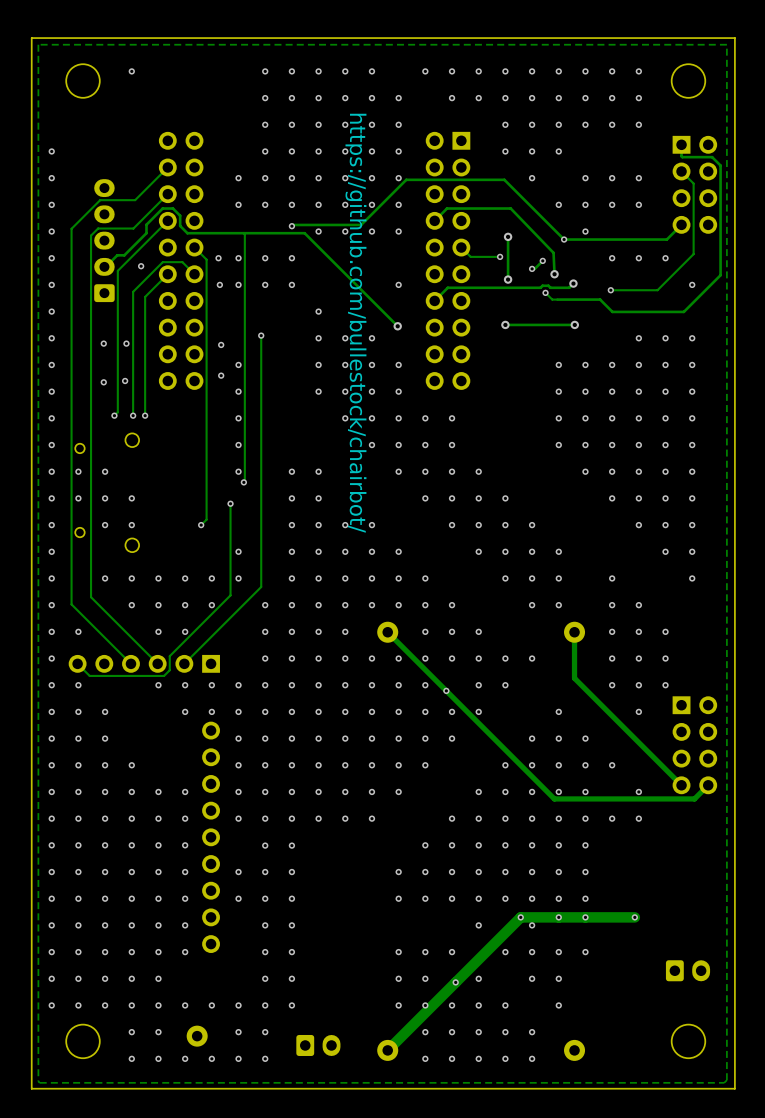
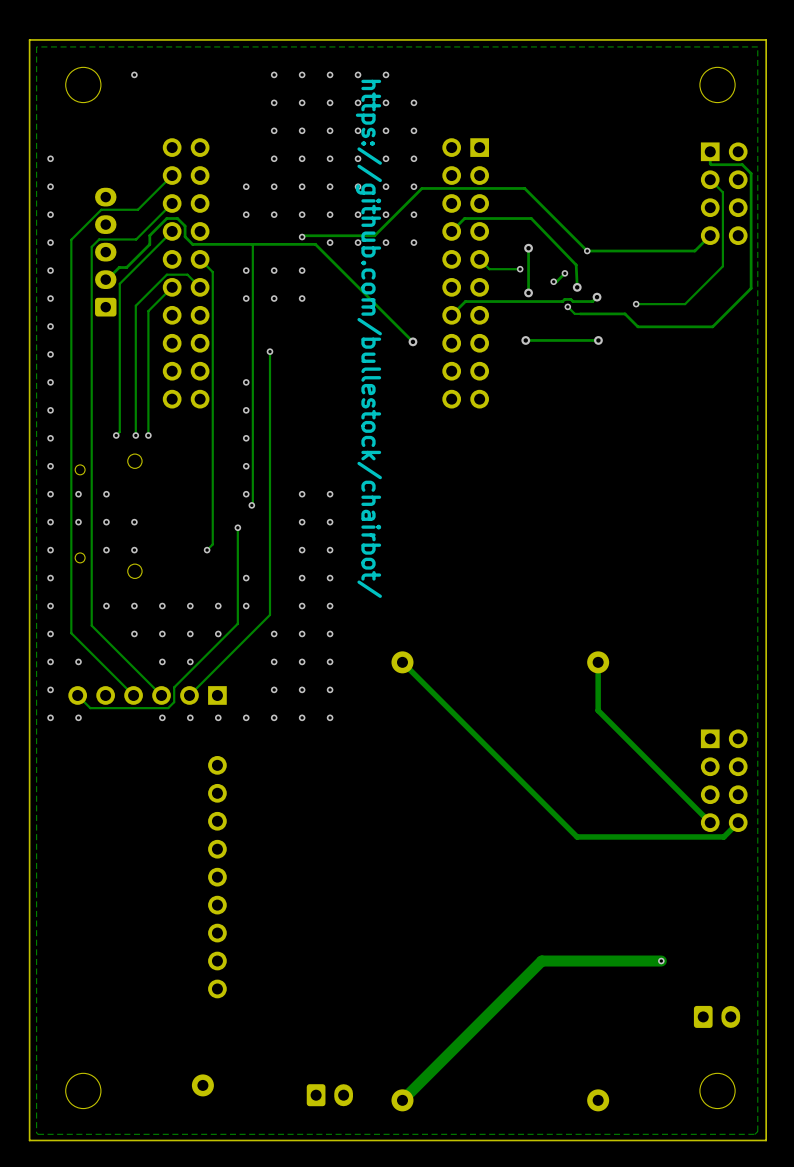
via: (425, 71) -> none
via: (452, 71) -> none
via: (478, 71) -> none
via: (505, 71) -> none
via: (532, 71) -> none
via: (558, 71) -> none
via: (585, 71) -> none
via: (612, 71) -> none
via: (638, 71) -> none
via: (452, 98) -> none
via: (478, 98) -> none
via: (505, 98) -> none
via: (532, 98) -> none
via: (558, 98) -> none
via: (585, 98) -> none
via: (612, 98) -> none
via: (638, 98) -> none
via: (505, 124) -> none
via: (532, 124) -> none
via: (558, 124) -> none
via: (585, 124) -> none
via: (612, 124) -> none
via: (638, 124) -> none
via: (505, 151) -> none
via: (532, 151) -> none
via: (558, 151) -> none
via: (532, 178) -> none
via: (585, 178) -> none
via: (612, 178) -> none
via: (638, 178) -> none
via: (558, 204) -> none
via: (585, 204) -> none
via: (612, 204) -> none
via: (638, 204) -> none
via: (585, 231) -> none
via: (218, 258) -> none
via: (612, 258) -> none
via: (638, 258) -> none
via: (665, 258) -> none
via: (141, 266) -> none
via: (219, 284) -> none
via: (398, 284) -> none
via: (692, 284) -> none
via: (318, 311) -> none
via: (318, 338) -> none
via: (345, 338) -> none
via: (371, 338) -> none
via: (638, 338) -> none
via: (665, 338) -> none
via: (692, 338) -> none
via: (103, 343) -> none
via: (126, 343) -> none
via: (221, 344) -> none
via: (318, 364) -> none
via: (345, 364) -> none
via: (371, 364) -> none
via: (398, 364) -> none
via: (558, 364) -> none
via: (585, 364) -> none
via: (612, 364) -> none
via: (638, 364) -> none
via: (665, 364) -> none
via: (692, 364) -> none
via: (221, 375) -> none
via: (125, 380) -> none
via: (103, 382) -> none
via: (318, 391) -> none
via: (345, 391) -> none
via: (371, 391) -> none
via: (398, 391) -> none
via: (558, 391) -> none
via: (585, 391) -> none
via: (612, 391) -> none
via: (638, 391) -> none
via: (665, 391) -> none
via: (692, 391) -> none
via: (345, 418) -> none
via: (371, 418) -> none
via: (398, 418) -> none
via: (425, 418) -> none
via: (452, 418) -> none
via: (558, 418) -> none
via: (585, 418) -> none
via: (612, 418) -> none
via: (638, 418) -> none
via: (665, 418) -> none
via: (692, 418) -> none
via: (371, 445) -> none
via: (398, 445) -> none
via: (425, 445) -> none
via: (452, 445) -> none
via: (558, 445) -> none
via: (585, 445) -> none
via: (612, 445) -> none
via: (638, 445) -> none
via: (665, 445) -> none
via: (692, 445) -> none
via: (398, 471) -> none
via: (425, 471) -> none
via: (452, 471) -> none
via: (478, 471) -> none
via: (585, 471) -> none
via: (612, 471) -> none
via: (638, 471) -> none
via: (665, 471) -> none
via: (692, 471) -> none
via: (425, 498) -> none
via: (452, 498) -> none
via: (478, 498) -> none
via: (505, 498) -> none
via: (612, 498) -> none
via: (638, 498) -> none
via: (665, 498) -> none
via: (692, 498) -> none
via: (345, 525) -> none
via: (371, 525) -> none
via: (452, 525) -> none
via: (478, 525) -> none
via: (505, 525) -> none
via: (532, 525) -> none
via: (638, 525) -> none
via: (665, 525) -> none
via: (692, 525) -> none
via: (345, 551) -> none
via: (371, 551) -> none
via: (398, 551) -> none
via: (478, 551) -> none
via: (505, 551) -> none
via: (532, 551) -> none
via: (558, 551) -> none
via: (665, 551) -> none
via: (692, 551) -> none
via: (345, 578) -> none
via: (371, 578) -> none
via: (398, 578) -> none
via: (425, 578) -> none
via: (505, 578) -> none
via: (532, 578) -> none
via: (558, 578) -> none
via: (612, 578) -> none
via: (692, 578) -> none
via: (345, 605) -> none
via: (371, 605) -> none
via: (398, 605) -> none
via: (425, 605) -> none
via: (452, 605) -> none
via: (532, 605) -> none
via: (558, 605) -> none
via: (612, 605) -> none
via: (638, 605) -> none
via: (345, 631) -> none
via: (425, 631) -> none
via: (452, 631) -> none
via: (478, 631) -> none
via: (612, 631) -> none
via: (638, 631) -> none
via: (665, 631) -> none
via: (345, 658) -> none
via: (371, 658) -> none
via: (398, 658) -> none
via: (425, 658) -> none
via: (452, 658) -> none
via: (478, 658) -> none
via: (505, 658) -> none
via: (532, 658) -> none
via: (612, 658) -> none
via: (638, 658) -> none
via: (665, 658) -> none
via: (345, 685) -> none
via: (371, 685) -> none
via: (398, 685) -> none
via: (425, 685) -> none
via: (478, 685) -> none
via: (505, 685) -> none
via: (612, 685) -> none
via: (638, 685) -> none
via: (665, 685) -> none
via: (446, 690) -> none
via: (51, 711) -> none
via: (78, 711) -> none
via: (105, 711) -> none
via: (185, 711) -> none
via: (211, 711) -> none
via: (238, 711) -> none
via: (265, 711) -> none
via: (291, 711) -> none
via: (318, 711) -> none
via: (345, 711) -> none
via: (371, 711) -> none
via: (398, 711) -> none
via: (425, 711) -> none
via: (452, 711) -> none
via: (478, 711) -> none
via: (558, 711) -> none
via: (638, 711) -> none
via: (51, 738) -> none
via: (78, 738) -> none
via: (105, 738) -> none
via: (238, 738) -> none
via: (265, 738) -> none
via: (291, 738) -> none
via: (318, 738) -> none
via: (345, 738) -> none
via: (371, 738) -> none
via: (398, 738) -> none
via: (425, 738) -> none
via: (452, 738) -> none
via: (532, 738) -> none
via: (558, 738) -> none
via: (585, 738) -> none
via: (51, 765) -> none
via: (78, 765) -> none
via: (105, 765) -> none
via: (131, 765) -> none
via: (238, 765) -> none
via: (265, 765) -> none
via: (291, 765) -> none
via: (318, 765) -> none
via: (345, 765) -> none
via: (371, 765) -> none
via: (398, 765) -> none
via: (425, 765) -> none
via: (505, 765) -> none
via: (532, 765) -> none
via: (558, 765) -> none
via: (585, 765) -> none
via: (612, 765) -> none
via: (51, 791) -> none
via: (78, 791) -> none
via: (105, 791) -> none
via: (131, 791) -> none
via: (158, 791) -> none
via: (185, 791) -> none
via: (238, 791) -> none
via: (265, 791) -> none
via: (291, 791) -> none
via: (318, 791) -> none
via: (345, 791) -> none
via: (371, 791) -> none
via: (398, 791) -> none
via: (478, 791) -> none
via: (505, 791) -> none
via: (532, 791) -> none
via: (558, 791) -> none
via: (585, 791) -> none
via: (638, 791) -> none
via: (51, 818) -> none
via: (78, 818) -> none
via: (105, 818) -> none
via: (131, 818) -> none
via: (158, 818) -> none
via: (185, 818) -> none
via: (238, 818) -> none
via: (265, 818) -> none
via: (291, 818) -> none
via: (318, 818) -> none
via: (345, 818) -> none
via: (371, 818) -> none
via: (452, 818) -> none
via: (478, 818) -> none
via: (505, 818) -> none
via: (532, 818) -> none
via: (558, 818) -> none
via: (585, 818) -> none
via: (612, 818) -> none
via: (638, 818) -> none
via: (51, 845) -> none
via: (78, 845) -> none
via: (105, 845) -> none
via: (131, 845) -> none
via: (158, 845) -> none
via: (185, 845) -> none
via: (265, 845) -> none
via: (291, 845) -> none
via: (425, 845) -> none
via: (452, 845) -> none
via: (478, 845) -> none
via: (505, 845) -> none
via: (532, 845) -> none
via: (558, 845) -> none
via: (585, 845) -> none
via: (51, 872) -> none
via: (78, 872) -> none
via: (105, 872) -> none
via: (131, 872) -> none
via: (158, 872) -> none
via: (185, 872) -> none
via: (238, 872) -> none
via: (265, 872) -> none
via: (291, 872) -> none
via: (398, 872) -> none
via: (425, 872) -> none
via: (452, 872) -> none
via: (478, 872) -> none
via: (505, 872) -> none
via: (532, 872) -> none
via: (558, 872) -> none
via: (585, 872) -> none
via: (51, 898) -> none
via: (78, 898) -> none
via: (105, 898) -> none
via: (131, 898) -> none
via: (158, 898) -> none
via: (185, 898) -> none
via: (238, 898) -> none
via: (265, 898) -> none
via: (291, 898) -> none
via: (398, 898) -> none
via: (425, 898) -> none
via: (452, 898) -> none
via: (478, 898) -> none
via: (505, 898) -> none
via: (532, 898) -> none
via: (558, 898) -> none
via: (585, 898) -> none
via: (520, 917) -> none
via: (558, 917) -> none
via: (585, 917) -> none
via: (51, 925) -> none
via: (78, 925) -> none
via: (105, 925) -> none
via: (131, 925) -> none
via: (158, 925) -> none
via: (185, 925) -> none
via: (265, 925) -> none
via: (291, 925) -> none
via: (478, 925) -> none
via: (532, 925) -> none
via: (51, 952) -> none
via: (78, 952) -> none
via: (105, 952) -> none
via: (131, 952) -> none
via: (158, 952) -> none
via: (185, 952) -> none
via: (265, 952) -> none
via: (291, 952) -> none
via: (398, 952) -> none
via: (425, 952) -> none
via: (452, 952) -> none
via: (505, 952) -> none
via: (532, 952) -> none
via: (558, 952) -> none
via: (585, 952) -> none
via: (51, 978) -> none
via: (78, 978) -> none
via: (105, 978) -> none
via: (131, 978) -> none
via: (158, 978) -> none
via: (265, 978) -> none
via: (291, 978) -> none
via: (398, 978) -> none
via: (425, 978) -> none
via: (478, 978) -> none
via: (532, 978) -> none
via: (558, 978) -> none
via: (455, 982) -> none
via: (51, 1005) -> none
via: (78, 1005) -> none
via: (105, 1005) -> none
via: (131, 1005) -> none
via: (158, 1005) -> none
via: (185, 1005) -> none
via: (211, 1005) -> none
via: (238, 1005) -> none
via: (265, 1005) -> none
via: (291, 1005) -> none
via: (398, 1005) -> none
via: (425, 1005) -> none
via: (452, 1005) -> none
via: (478, 1005) -> none
via: (505, 1005) -> none
via: (558, 1005) -> none
via: (131, 1032) -> none
via: (158, 1032) -> none
via: (238, 1032) -> none
via: (265, 1032) -> none
via: (425, 1032) -> none
via: (452, 1032) -> none
via: (478, 1032) -> none
via: (505, 1032) -> none
via: (532, 1032) -> none
via: (131, 1058) -> none
via: (158, 1058) -> none
via: (185, 1058) -> none
via: (211, 1058) -> none
via: (238, 1058) -> none
via: (265, 1058) -> none
via: (425, 1058) -> none
via: (452, 1058) -> none
via: (478, 1058) -> none
via: (505, 1058) -> none
via: (532, 1058) -> none

